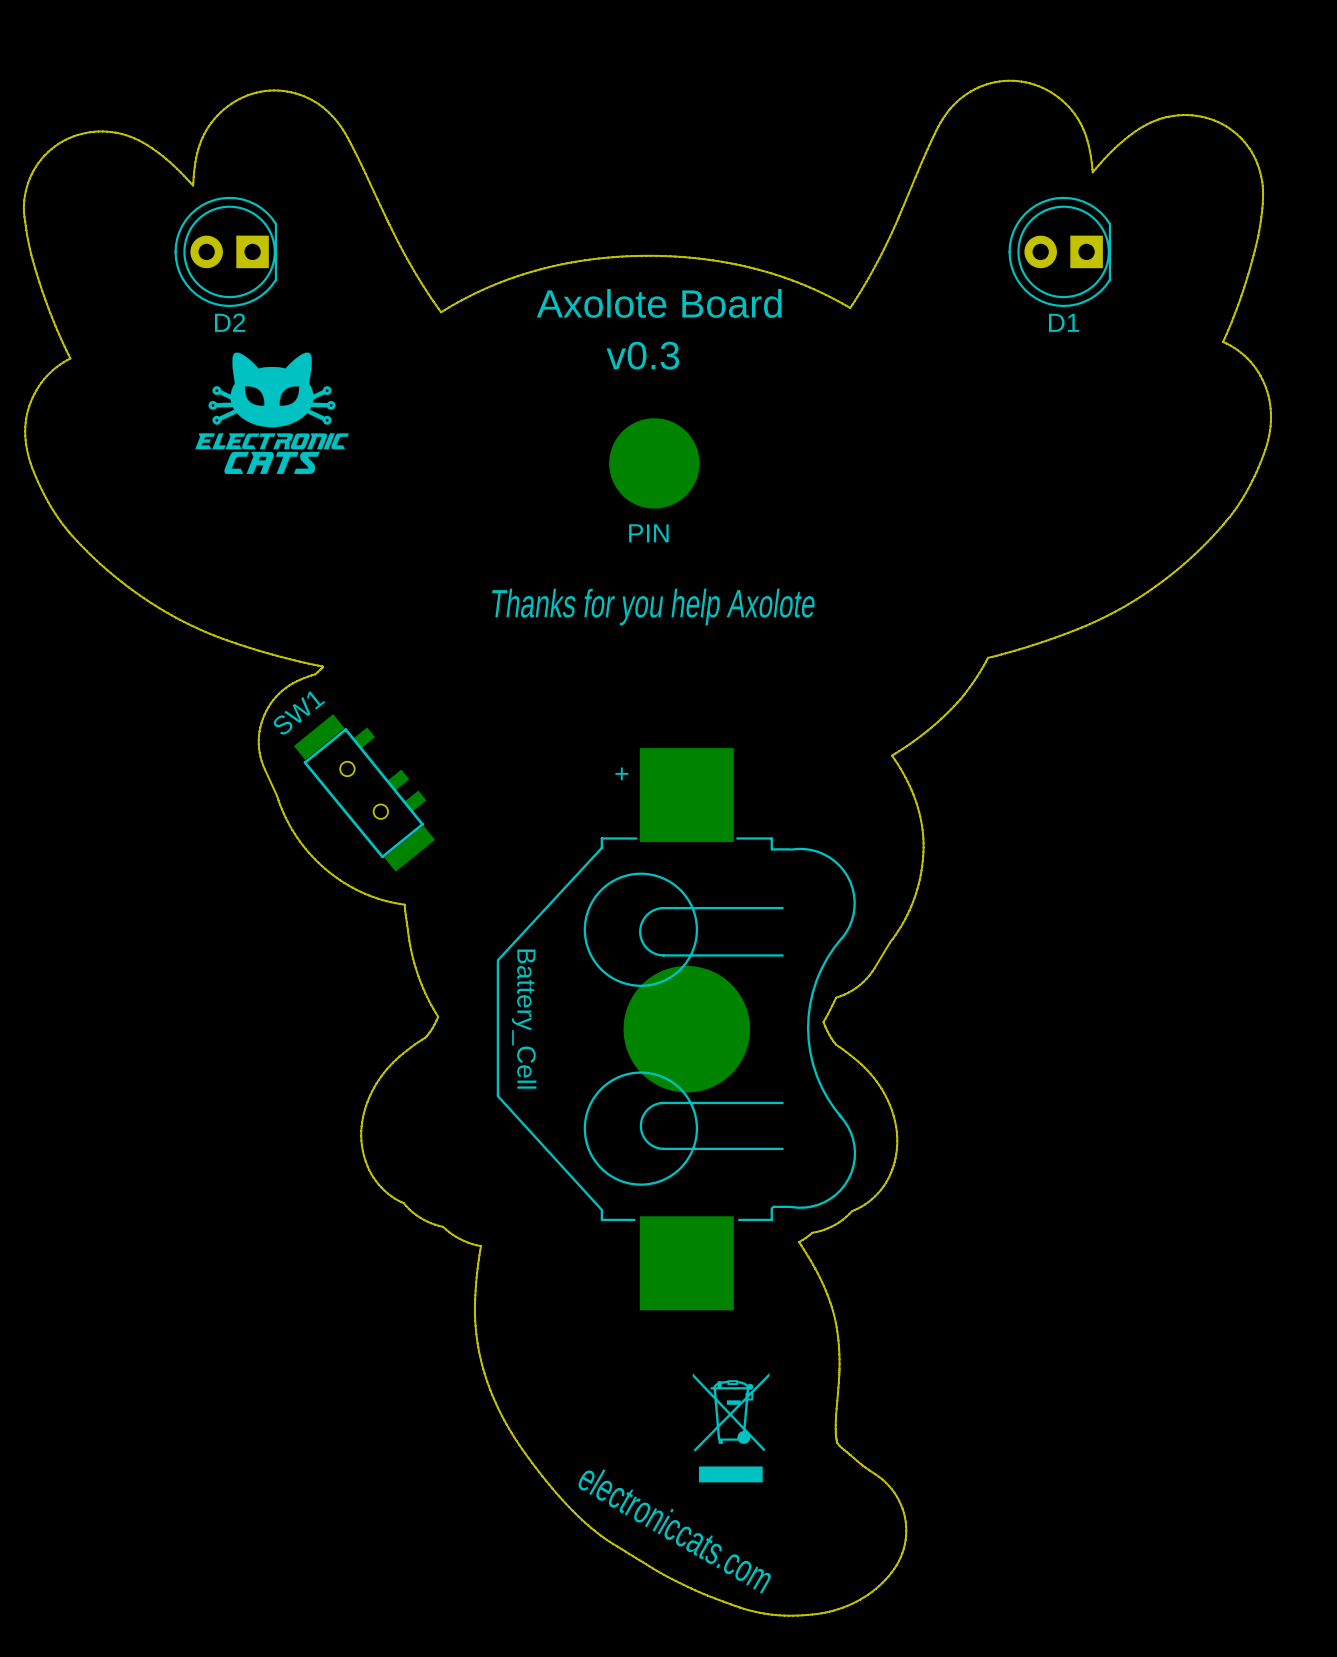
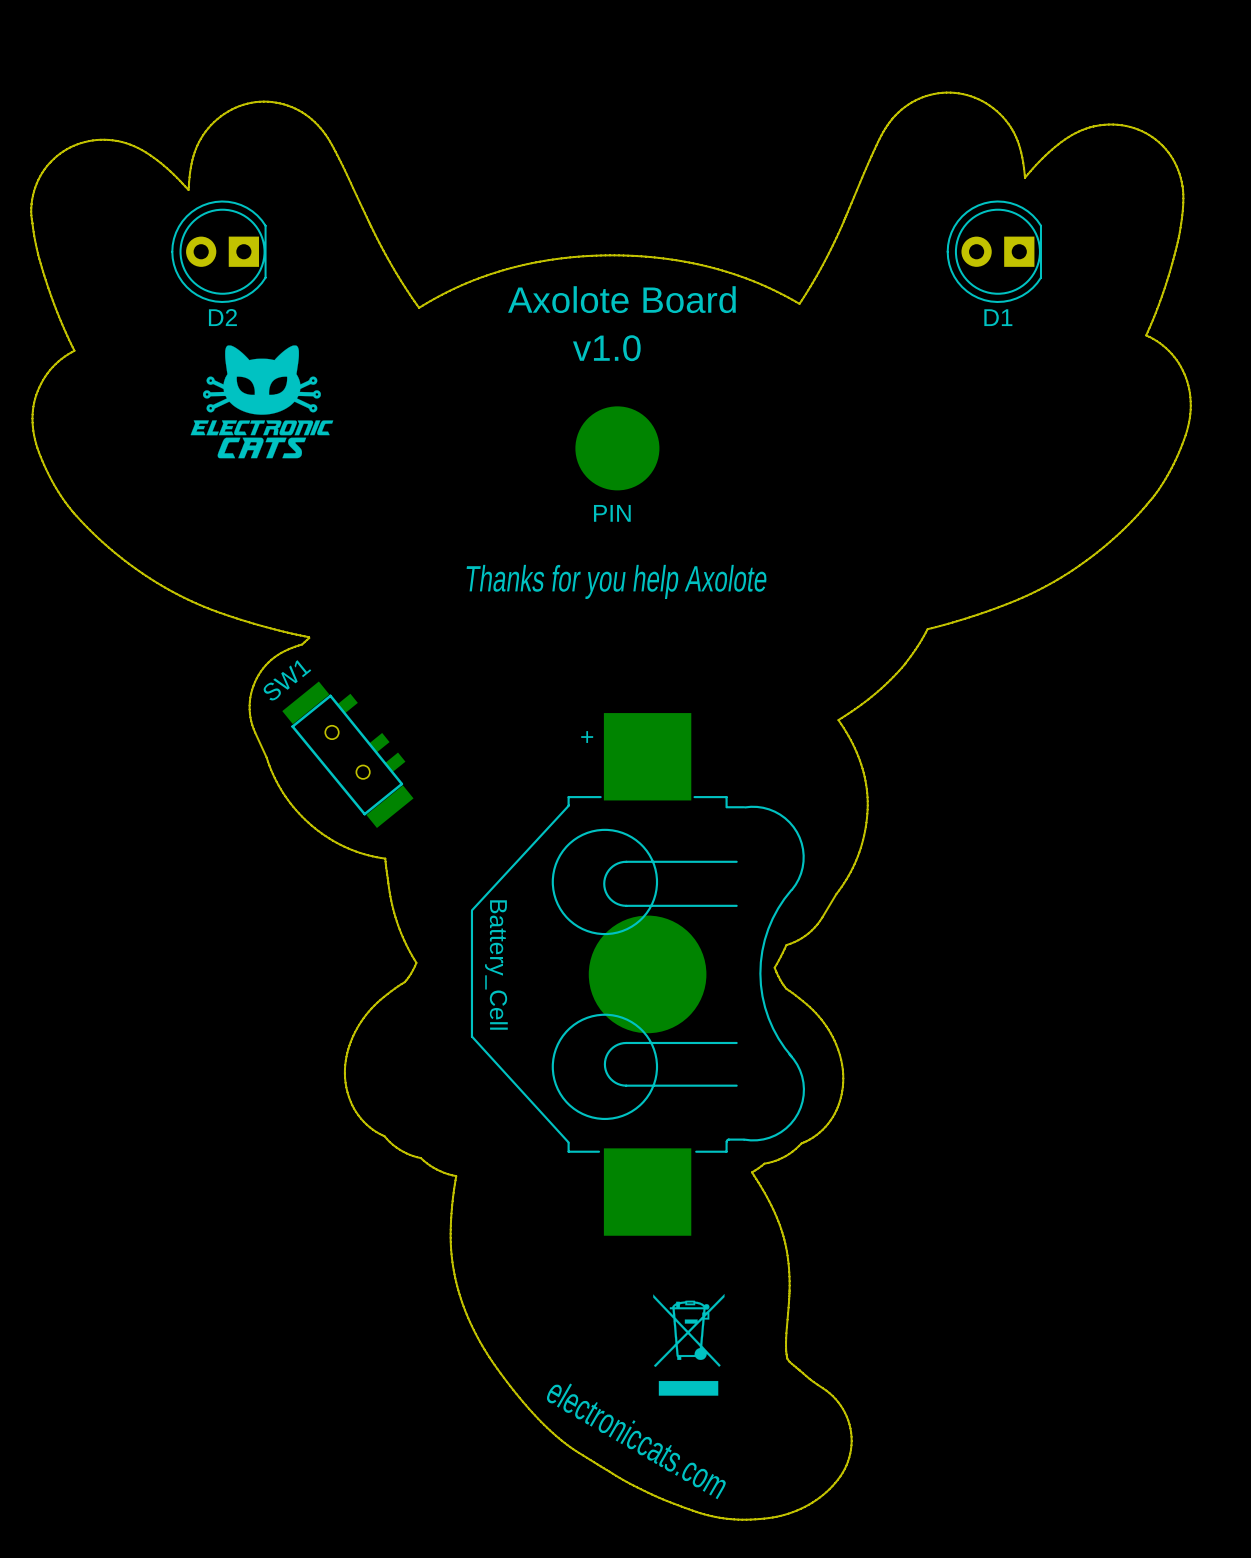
text: v0.3 (642, 355) -> v1.0 (606, 348)

